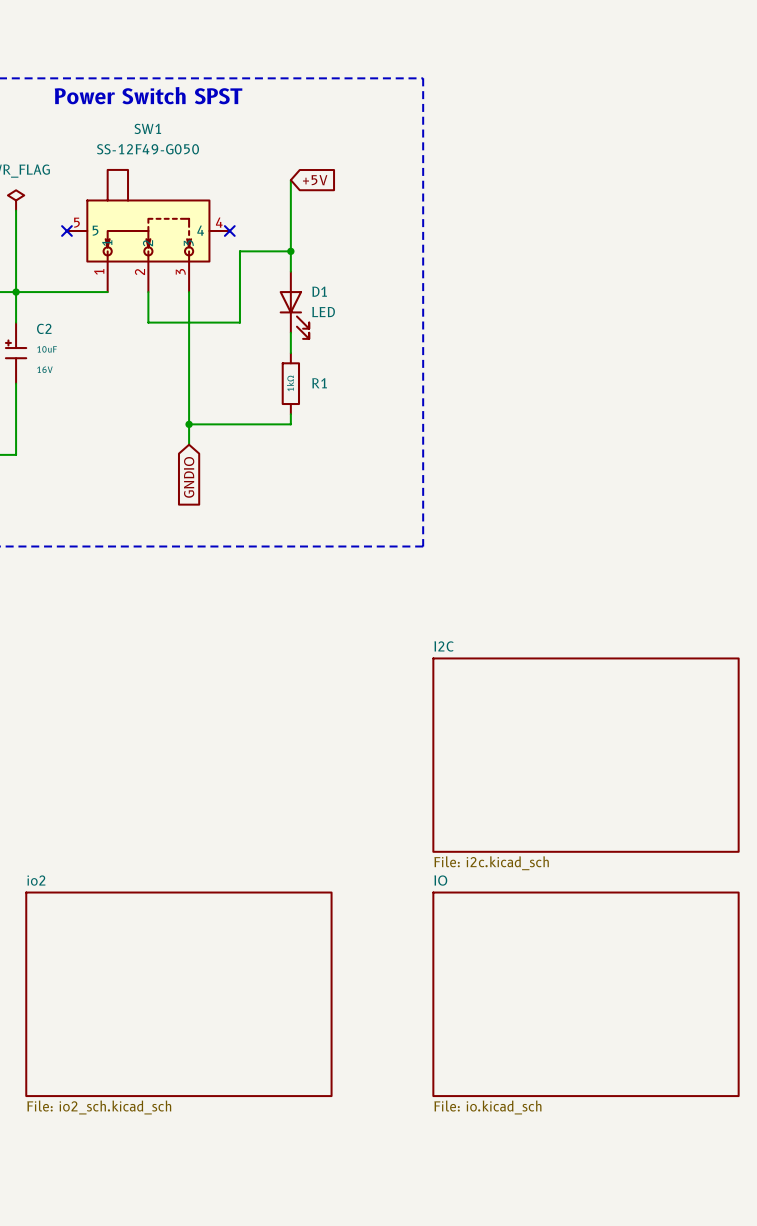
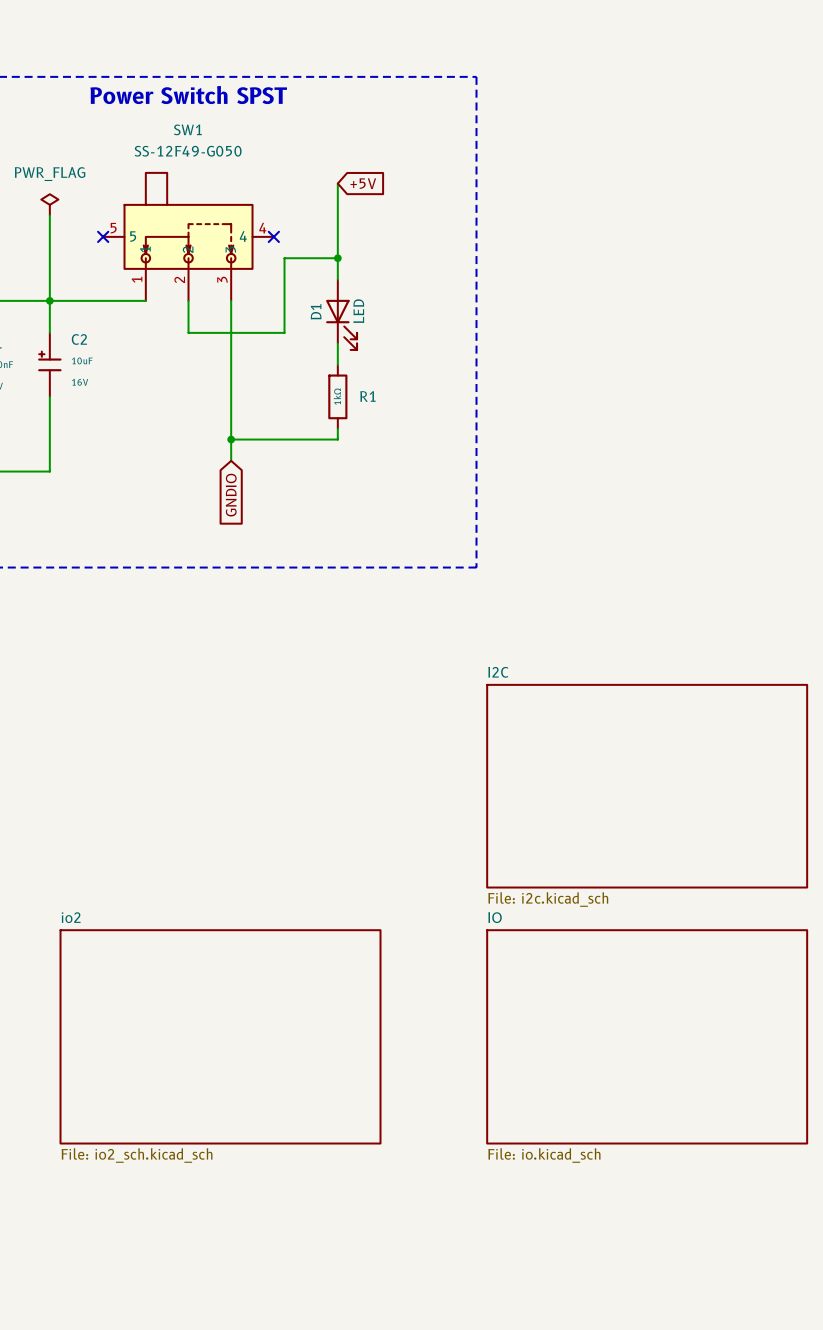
D1 name rotation: 0° (319, 291) -> 90° counterclockwise (316, 311)
D1 name position: D1 (319, 291) -> D1 (316, 311)
D1 value rotation: 0° (323, 312) -> 90° counterclockwise (358, 311)

